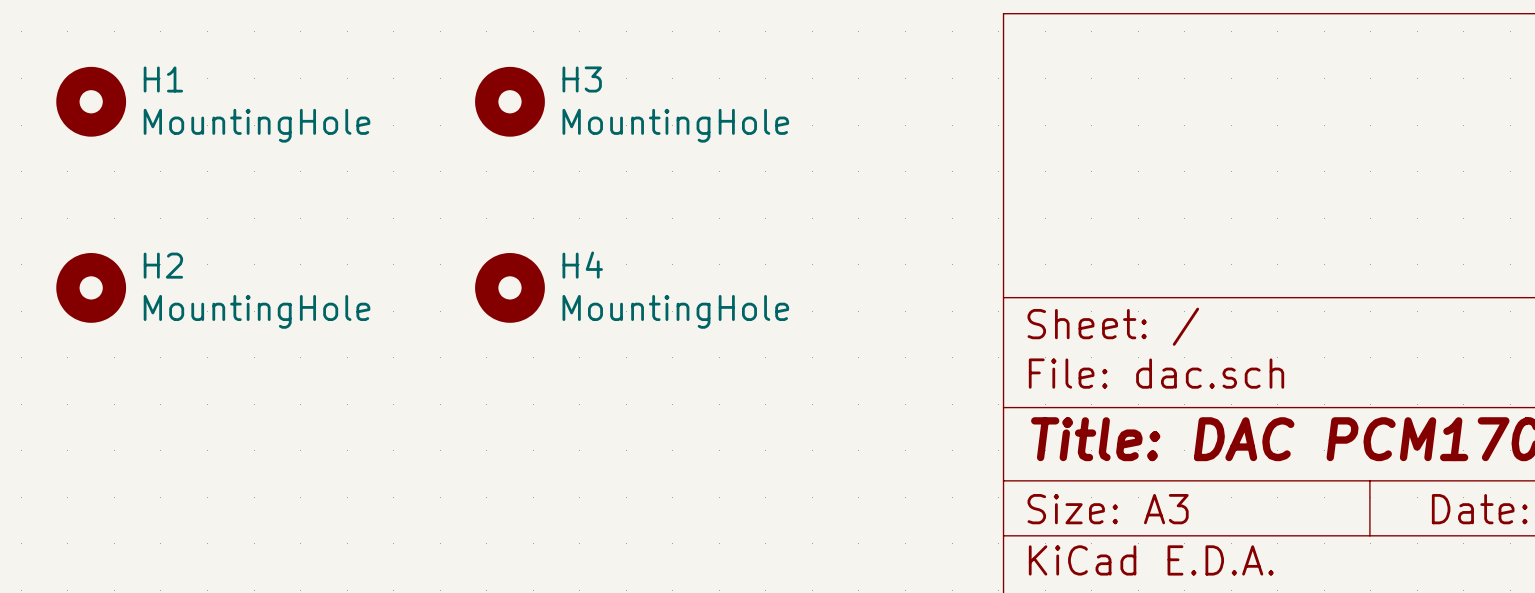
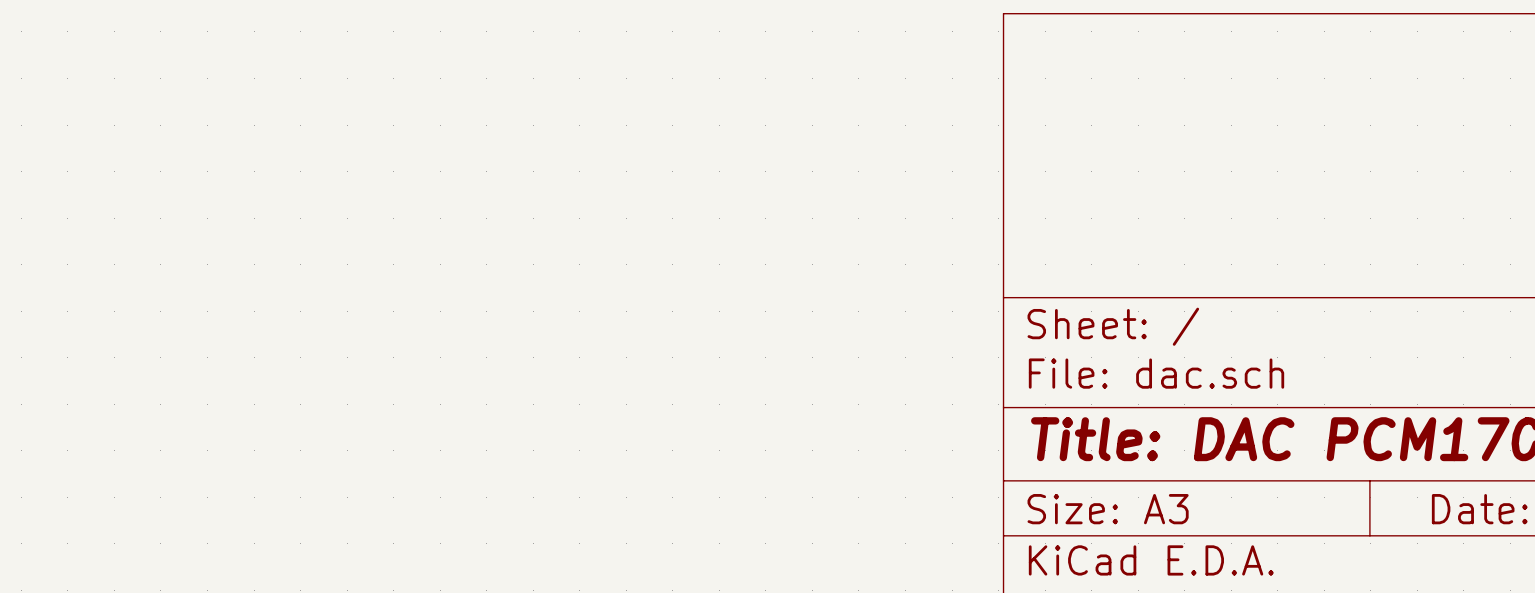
H1: MountingHole (91, 101) -> none
H3: MountingHole (509, 101) -> none
H2: MountingHole (91, 287) -> none
H4: MountingHole (509, 287) -> none

